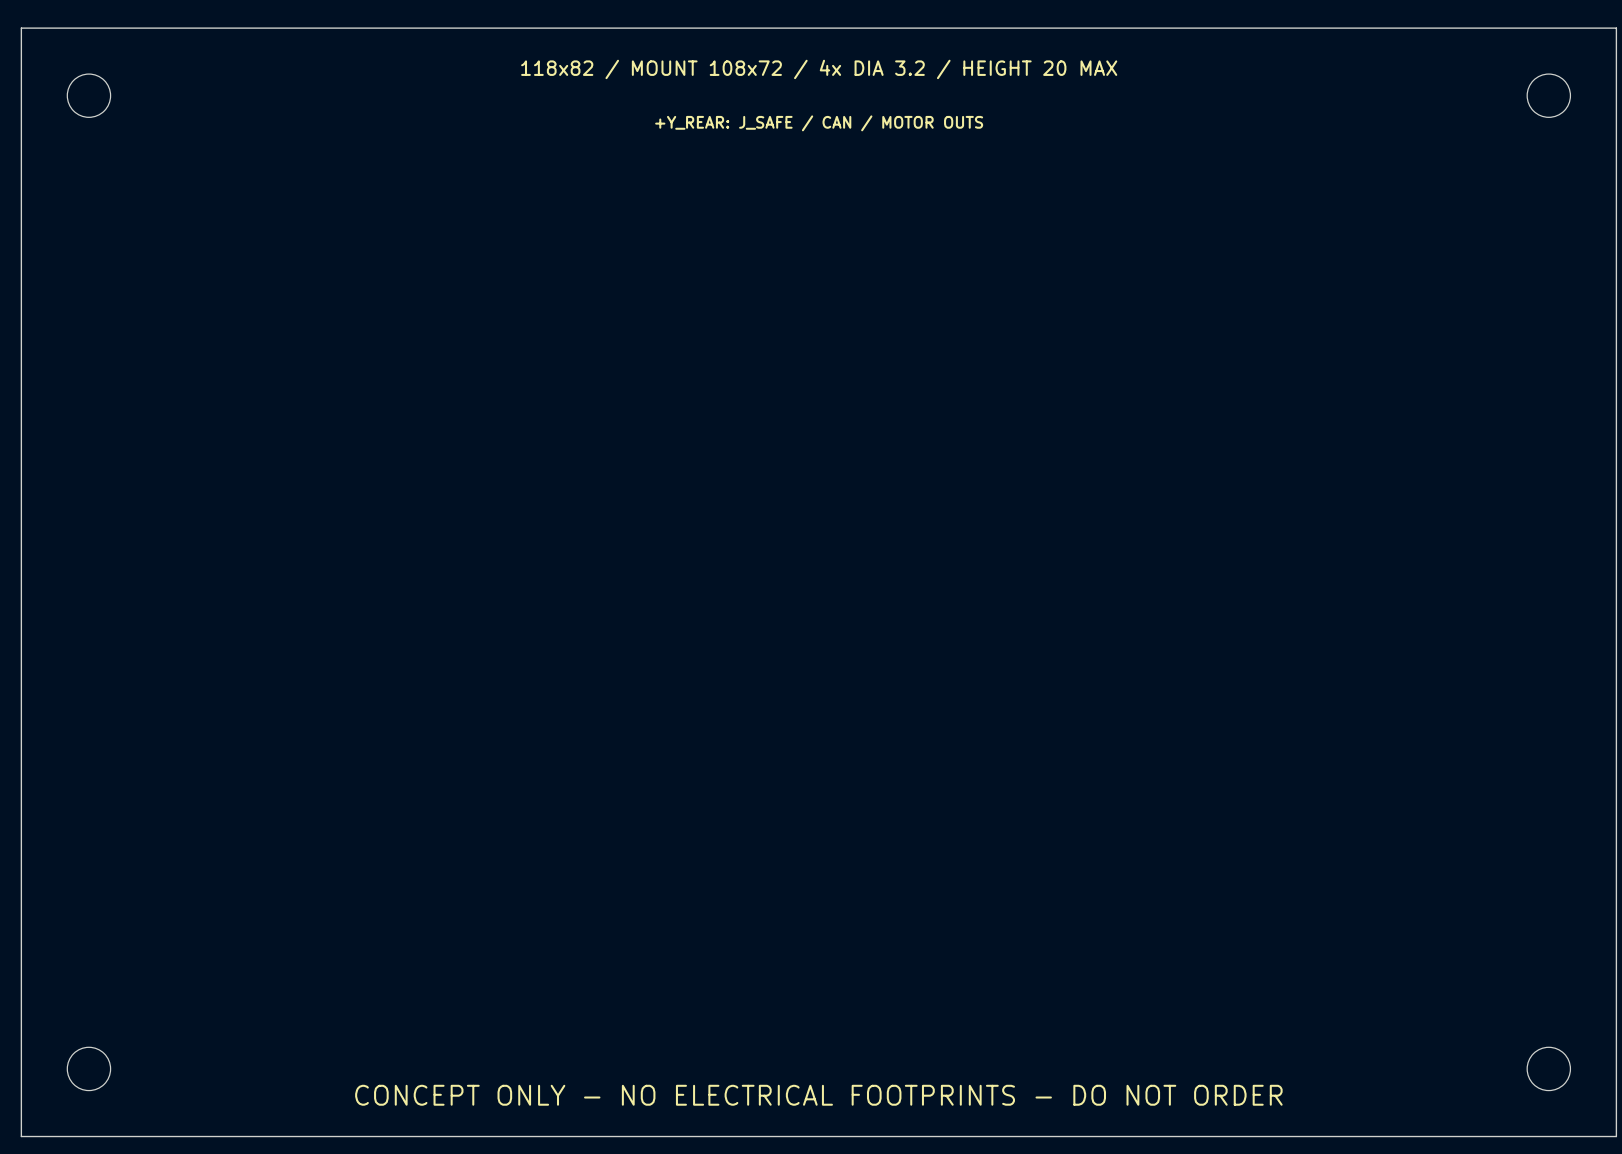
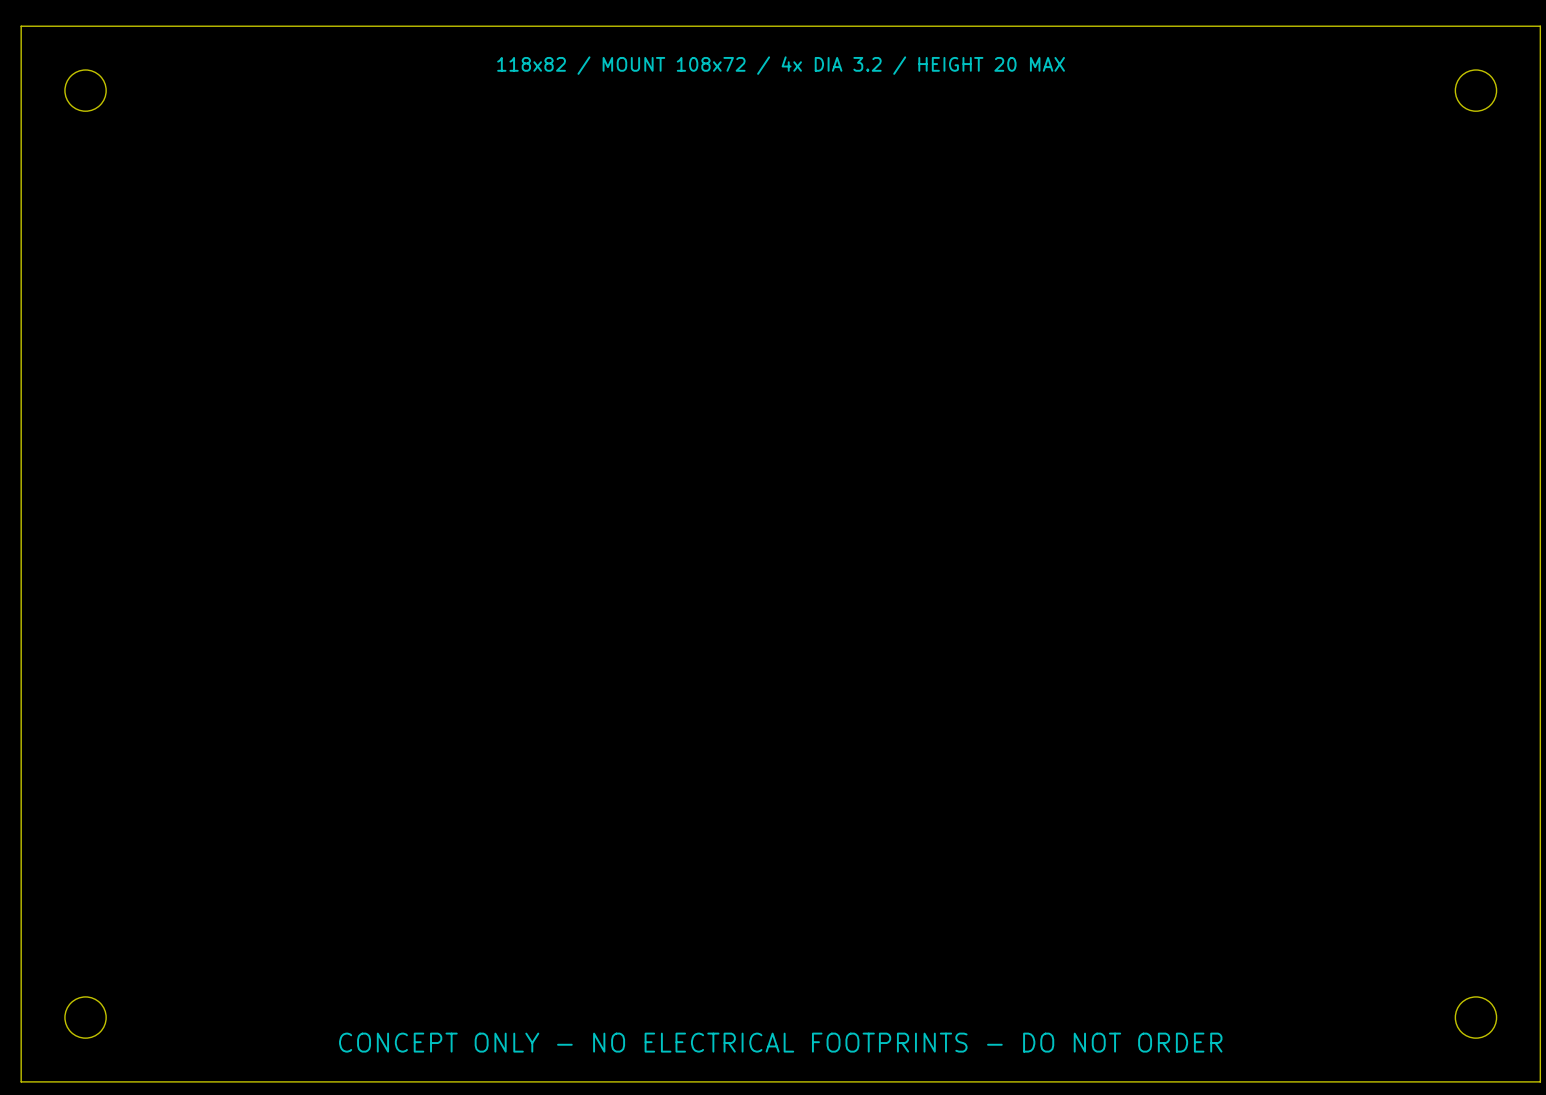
text: +Y_REAR: J_SAFE / CAN / MOTOR OUTS (819, 123) -> none

